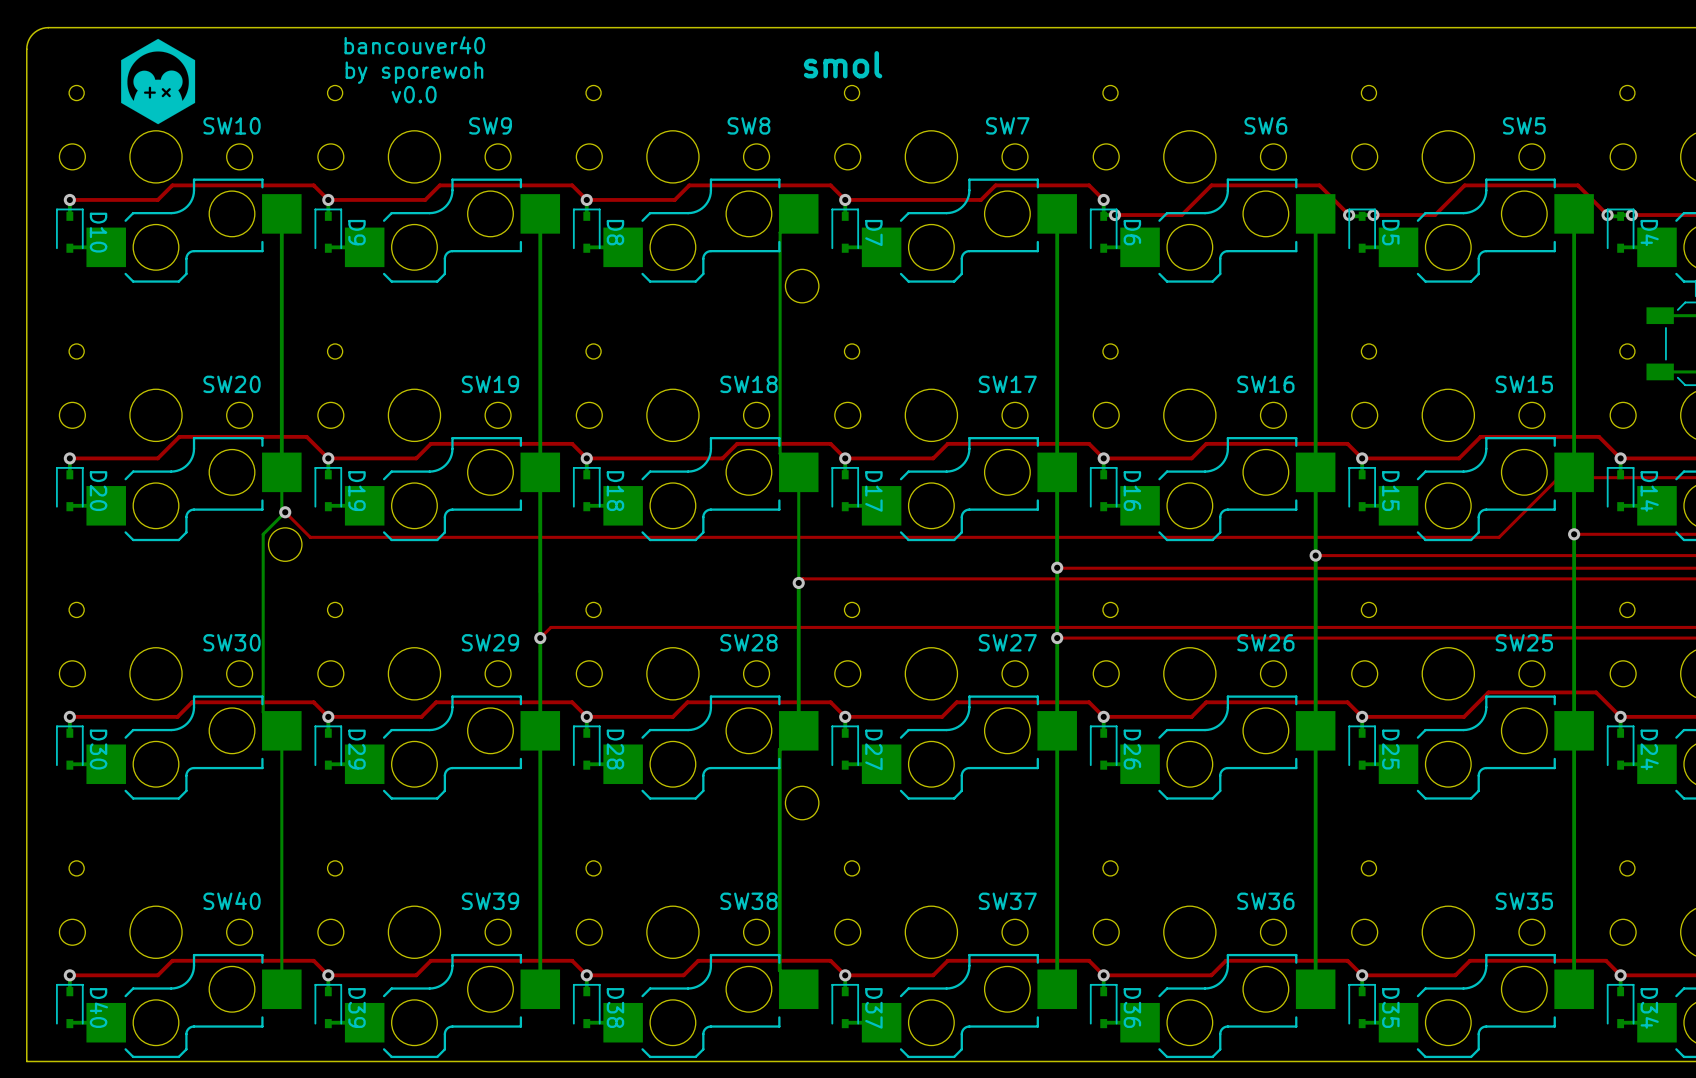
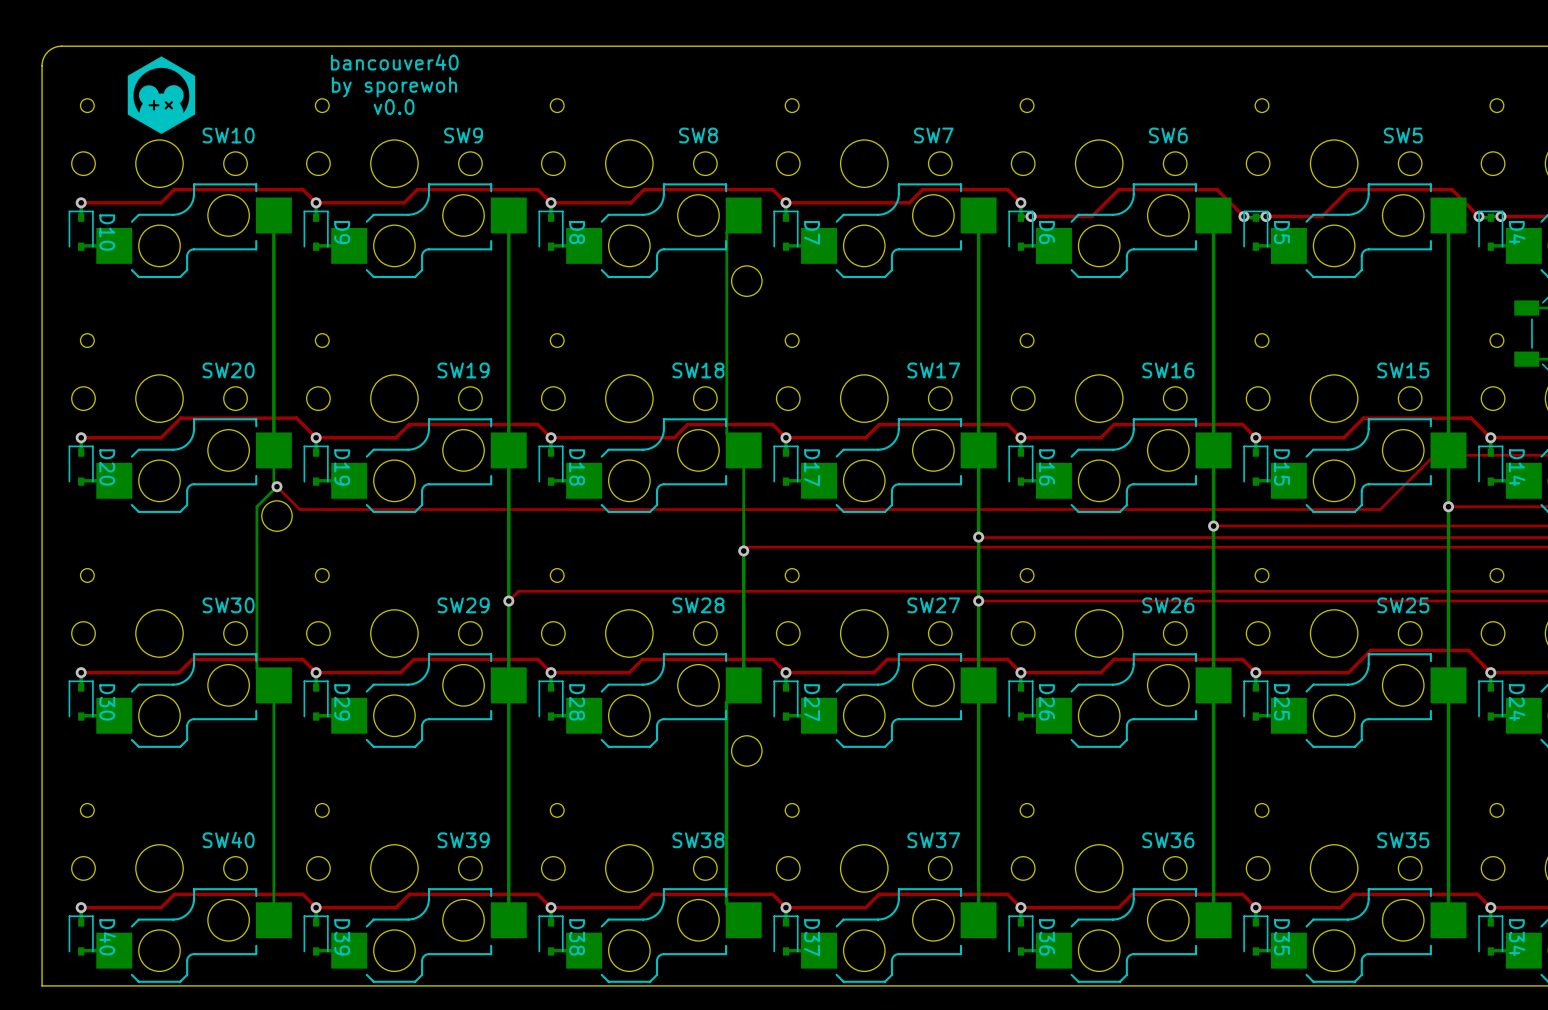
text: smol (843, 64) -> none

